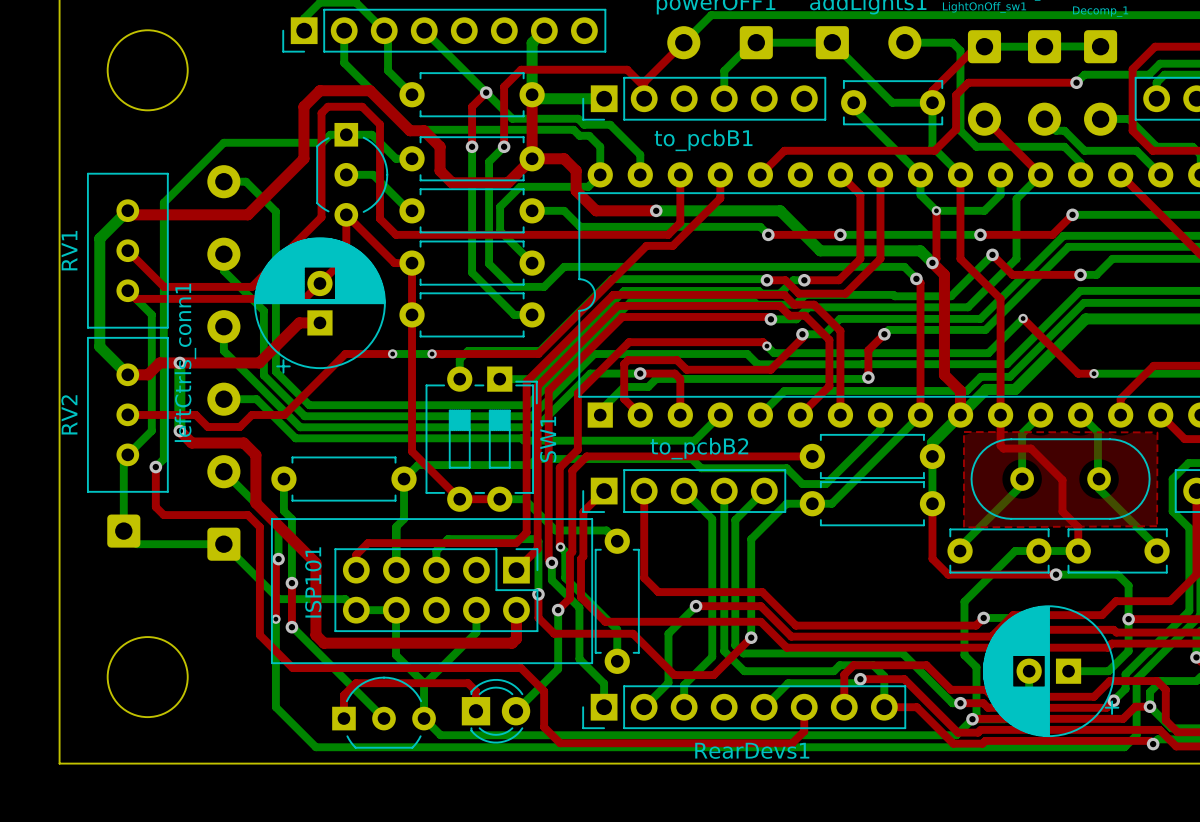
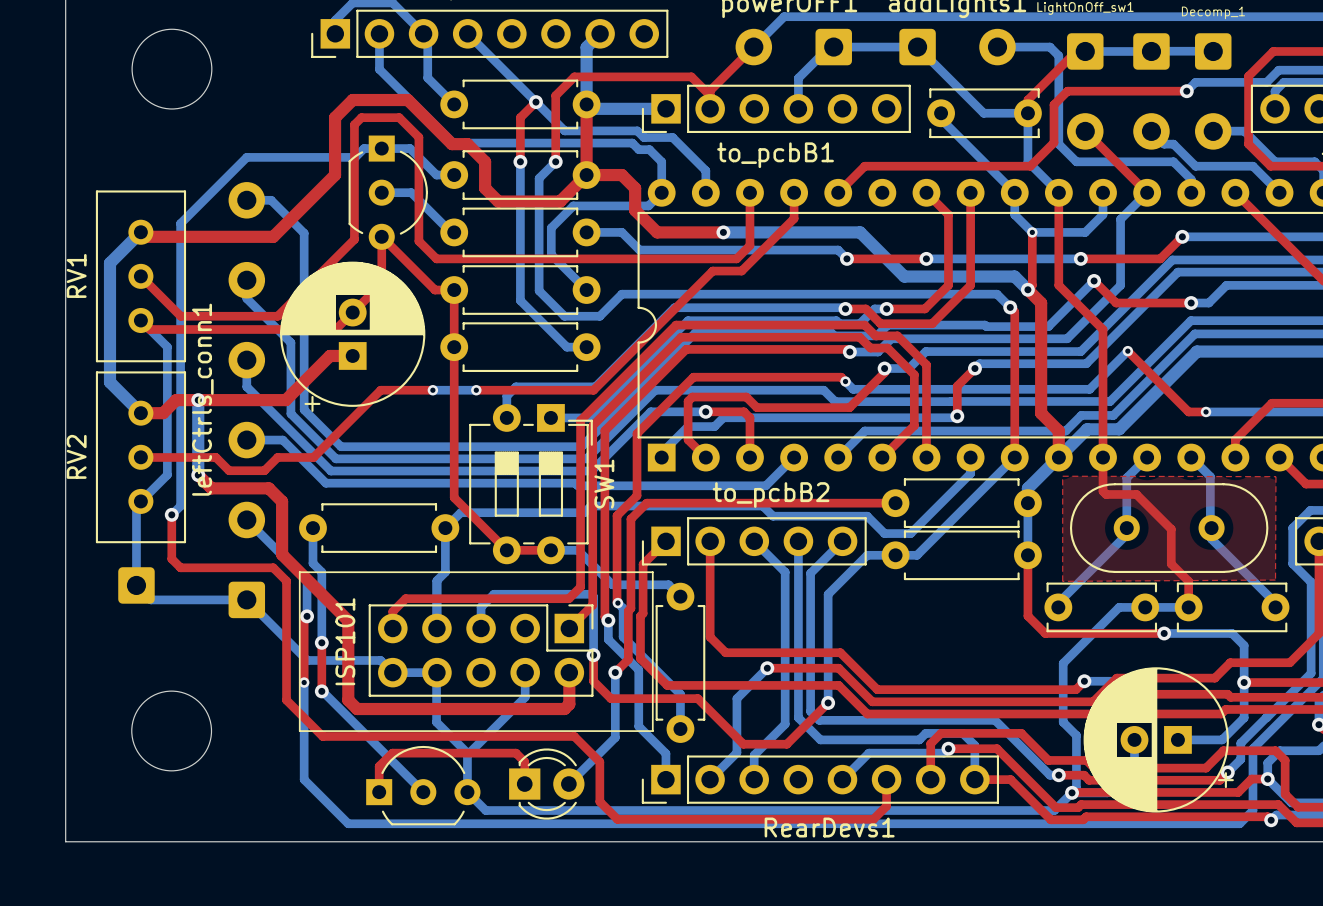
round board edge size: [107, 29, 189, 111] -> [131, 28, 213, 110]
round board edge: none -> [131, 690, 212, 772]
round board edge: [107, 636, 189, 718] -> none

